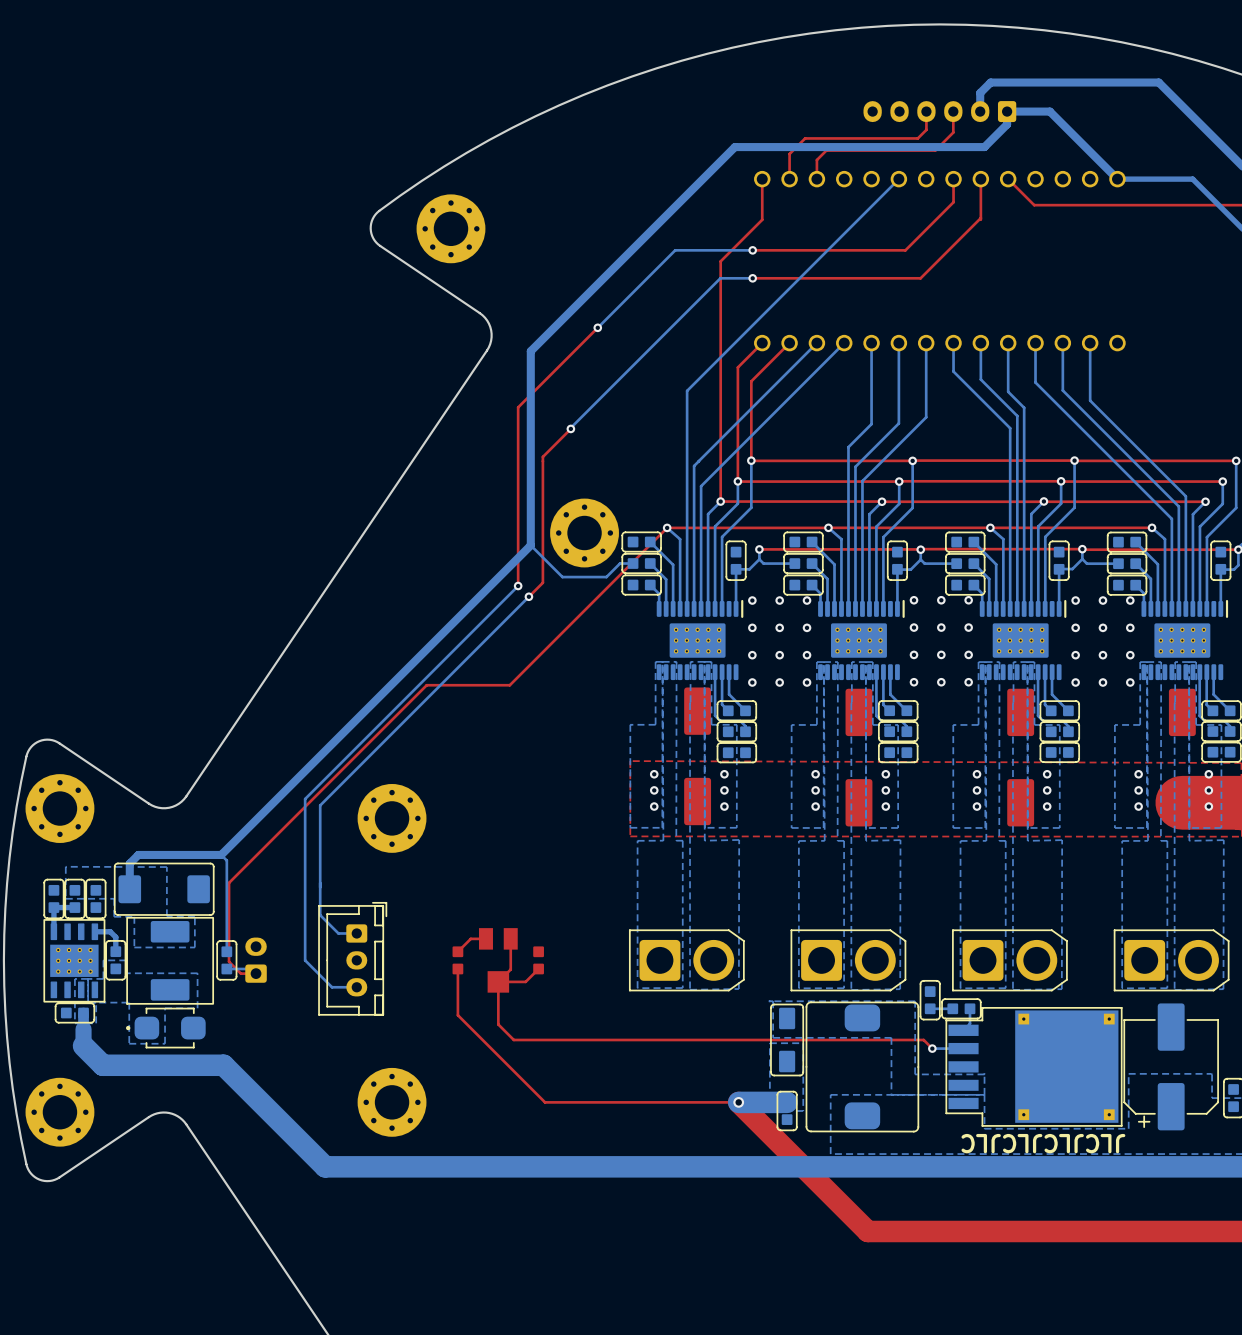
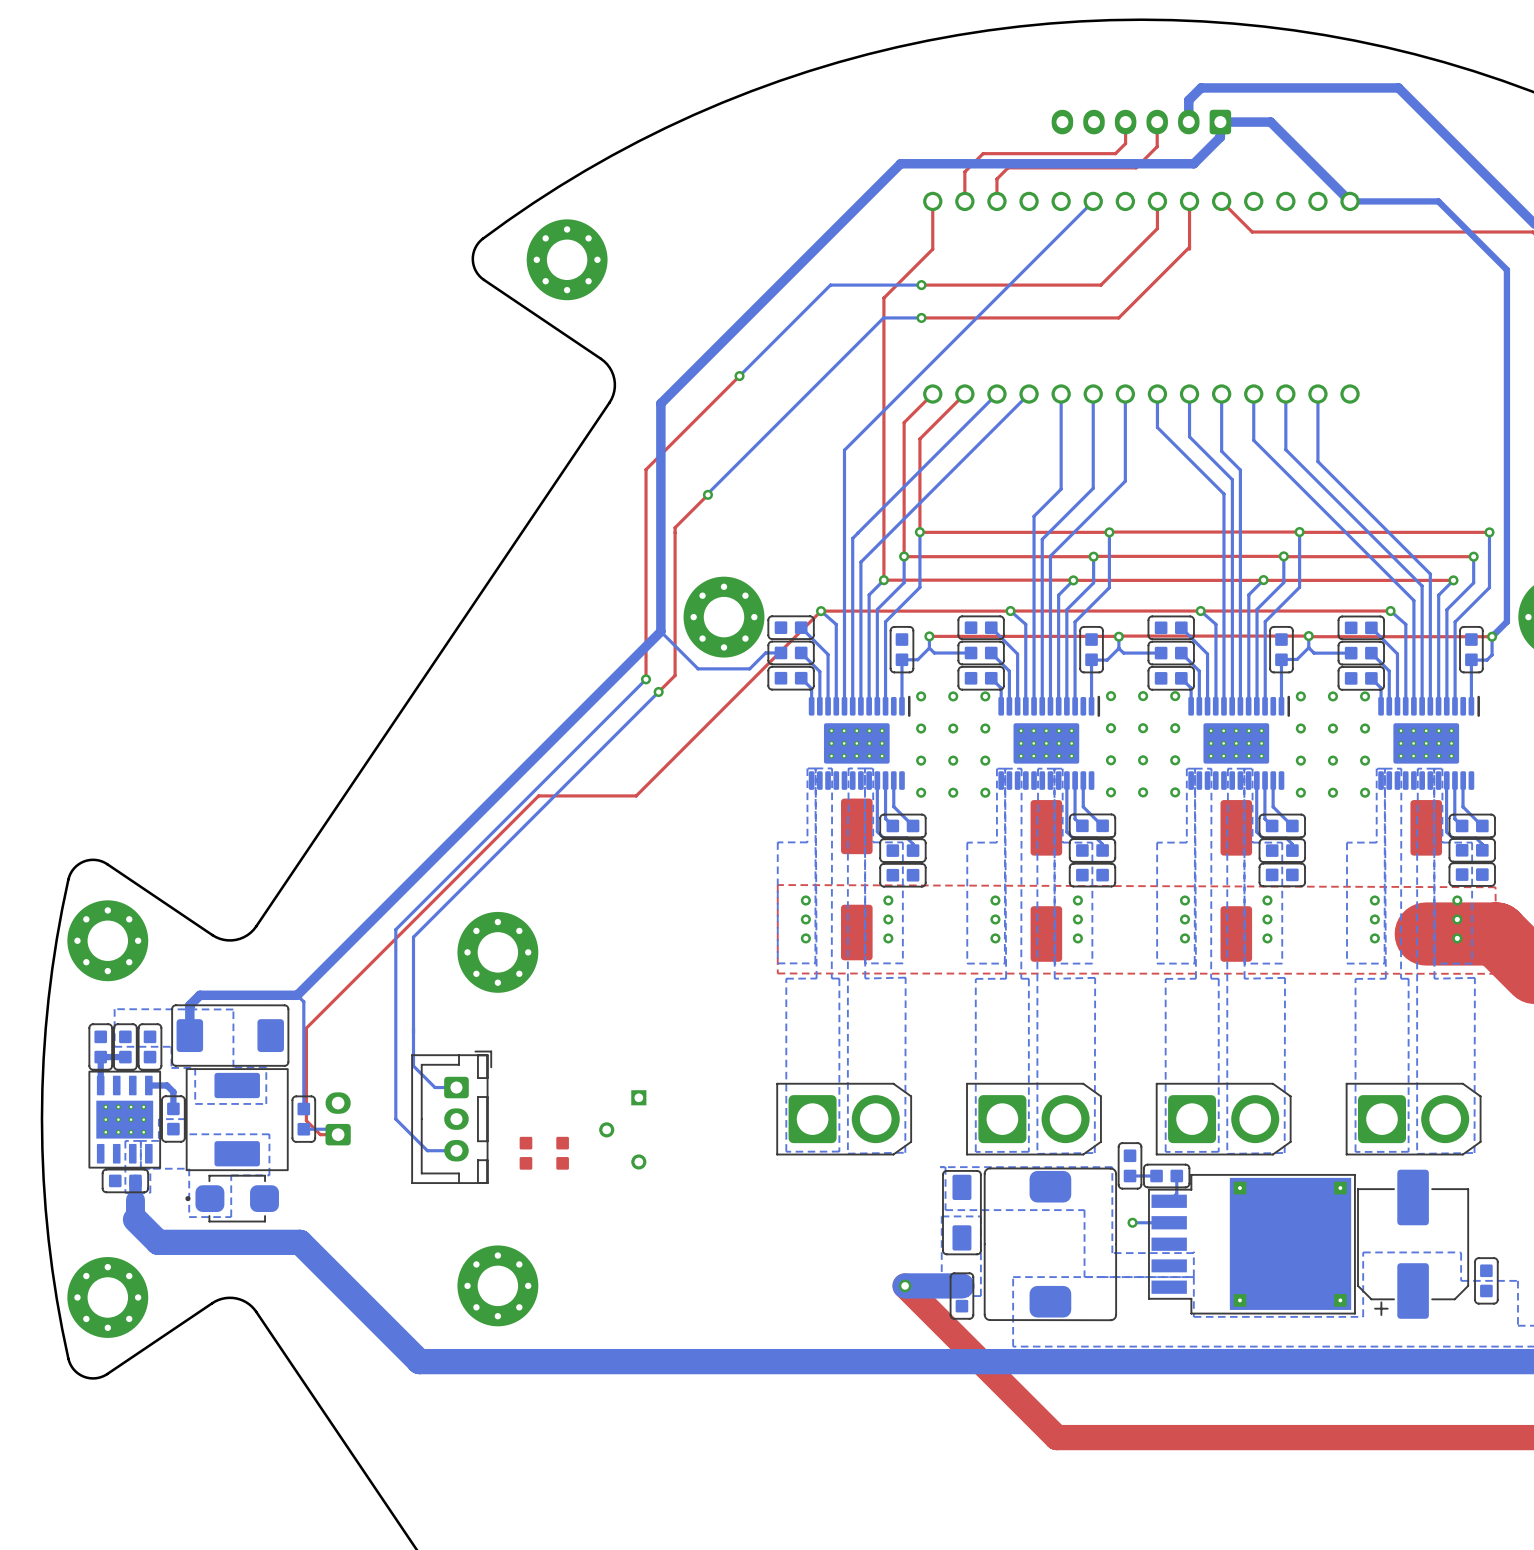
part footprint: [479, 928, 518, 993] -> [599, 1090, 647, 1170]
top track: (485, 938) (470, 938) (457, 951) -> none
top track: (510, 938) (510, 969) (498, 981) -> none
part: (457, 960) -> none
part: (538, 960) -> none
top track: (457, 968) (457, 1015) (545, 1102) (738, 1102) -> none
top track: (538, 968) (525, 981) (498, 981) -> none
top track: (498, 981) (498, 1024) (513, 1039) (923, 1039) (932, 1048) -> none
part: none -> (525, 1153)
part: none -> (562, 1153)
text: JLCJLCJLCJLC (1043, 1143) -> none

